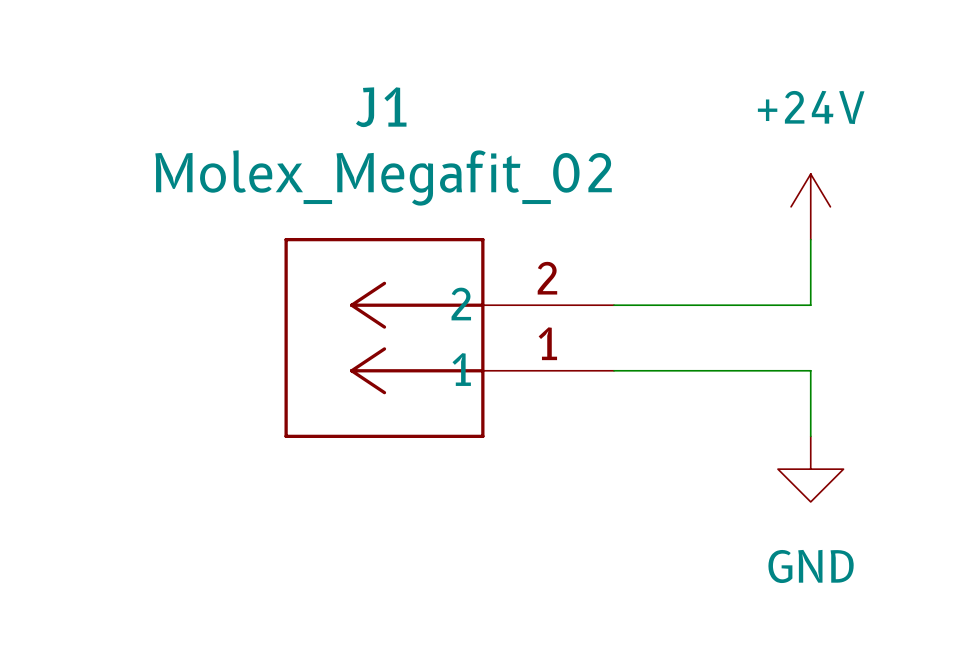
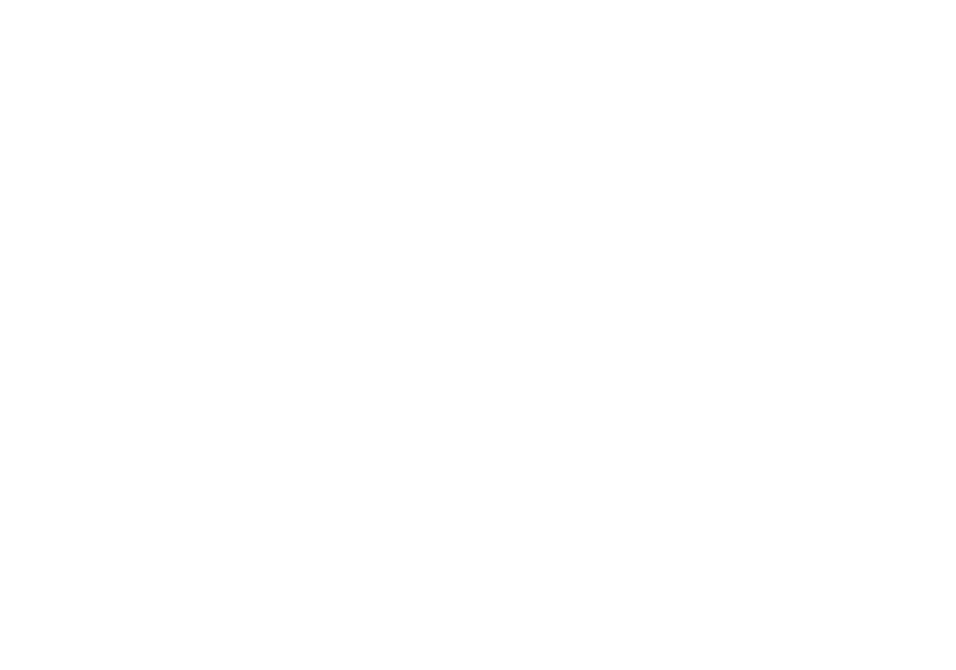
power symbol: +24V (810, 206) -> none
wire: (810, 239) (810, 305) (614, 305) -> none
J1: Molex_Megafit_02 (449, 337) -> none
wire: (614, 370) (810, 370) (810, 436) -> none
power symbol: GND (810, 469) -> none

